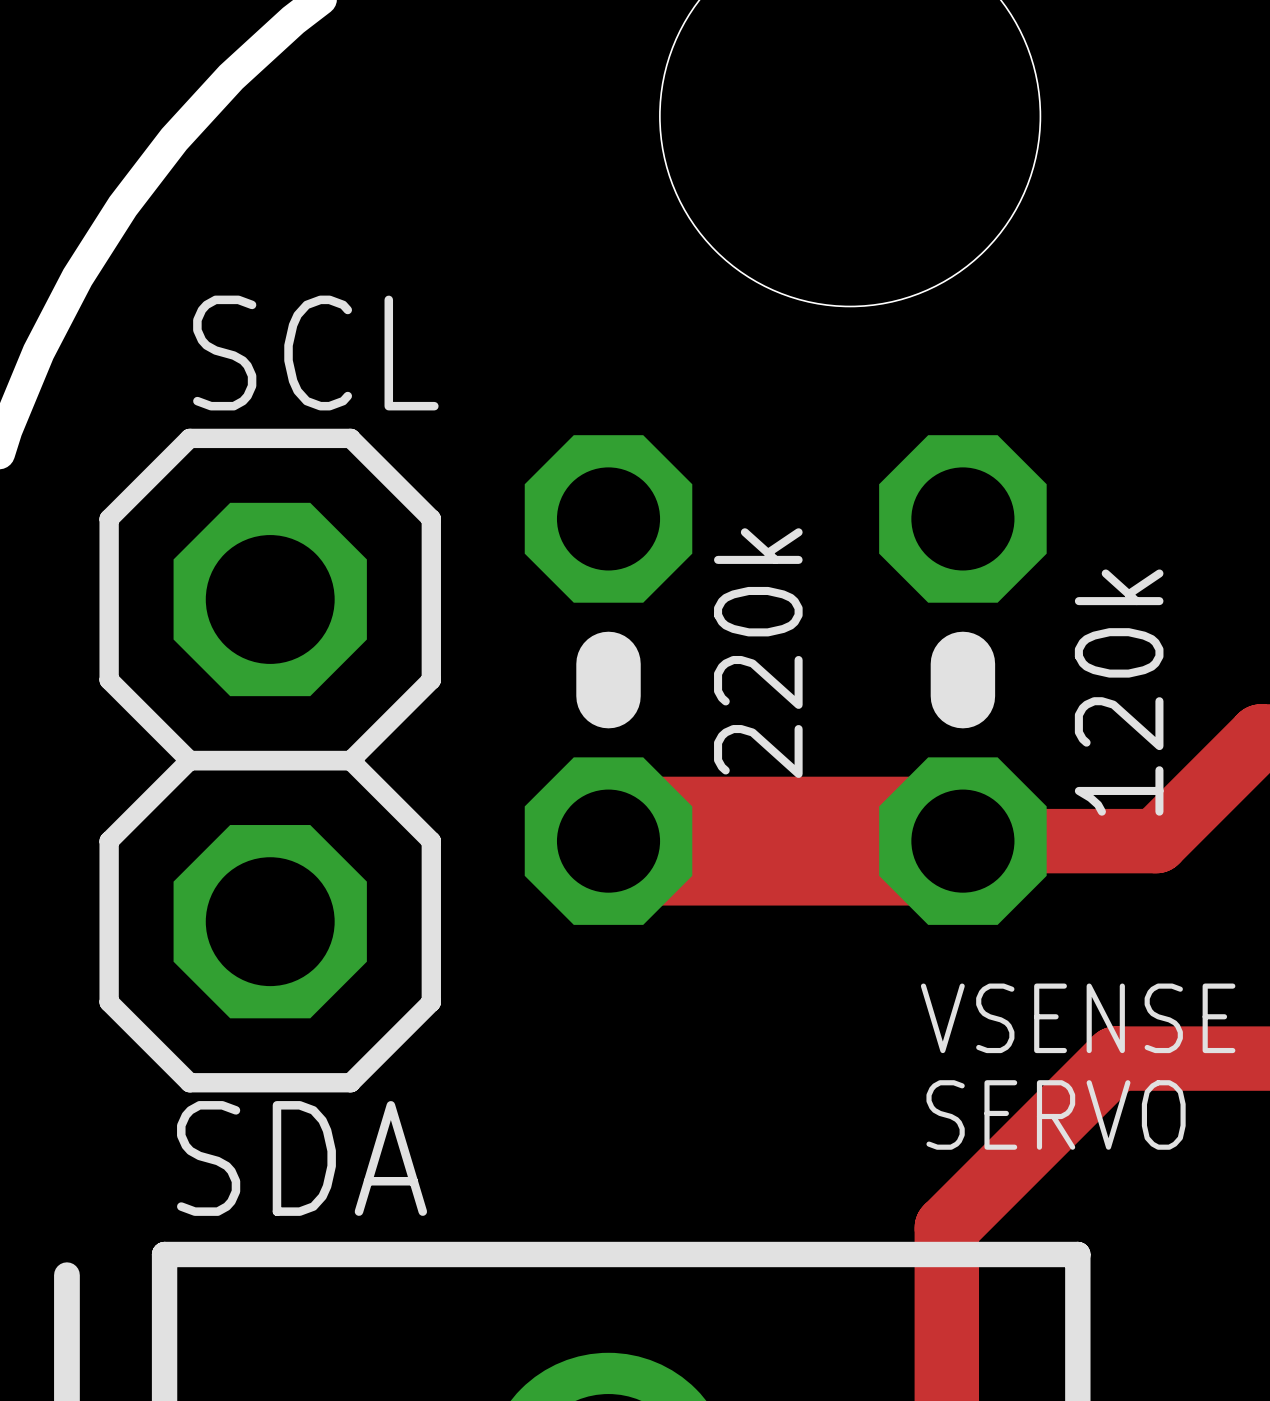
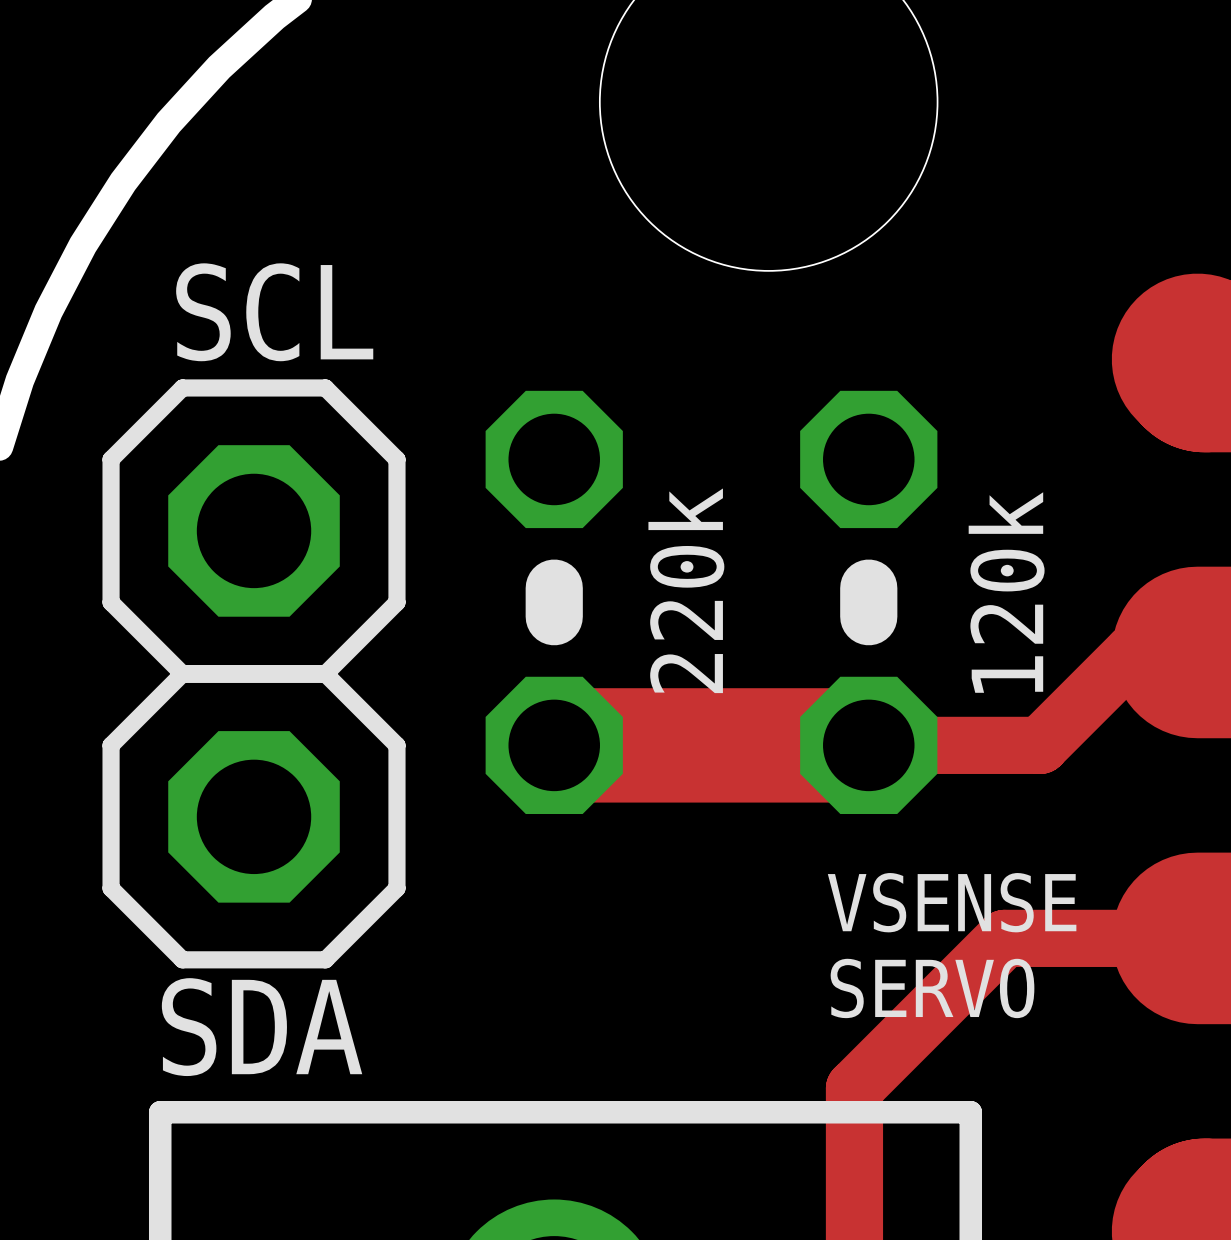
part footprint: [524, 435, 693, 925] -> [485, 390, 623, 815]
part footprint: [879, 435, 1047, 925] -> [800, 390, 938, 815]

